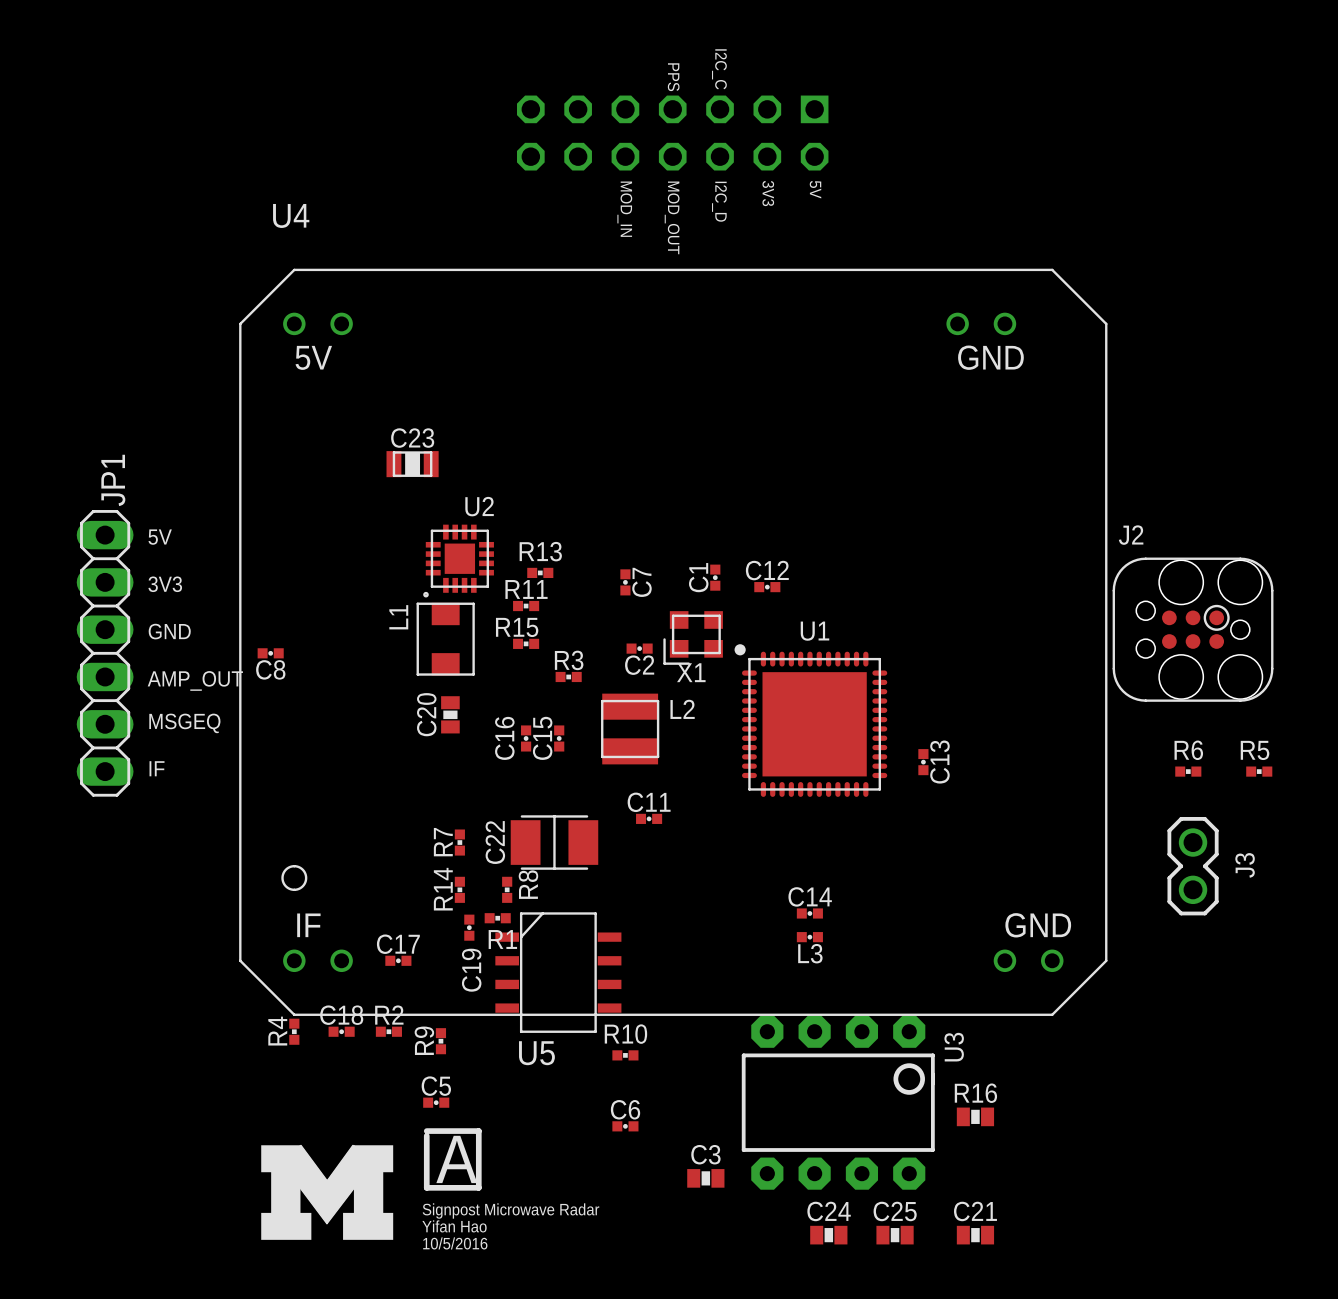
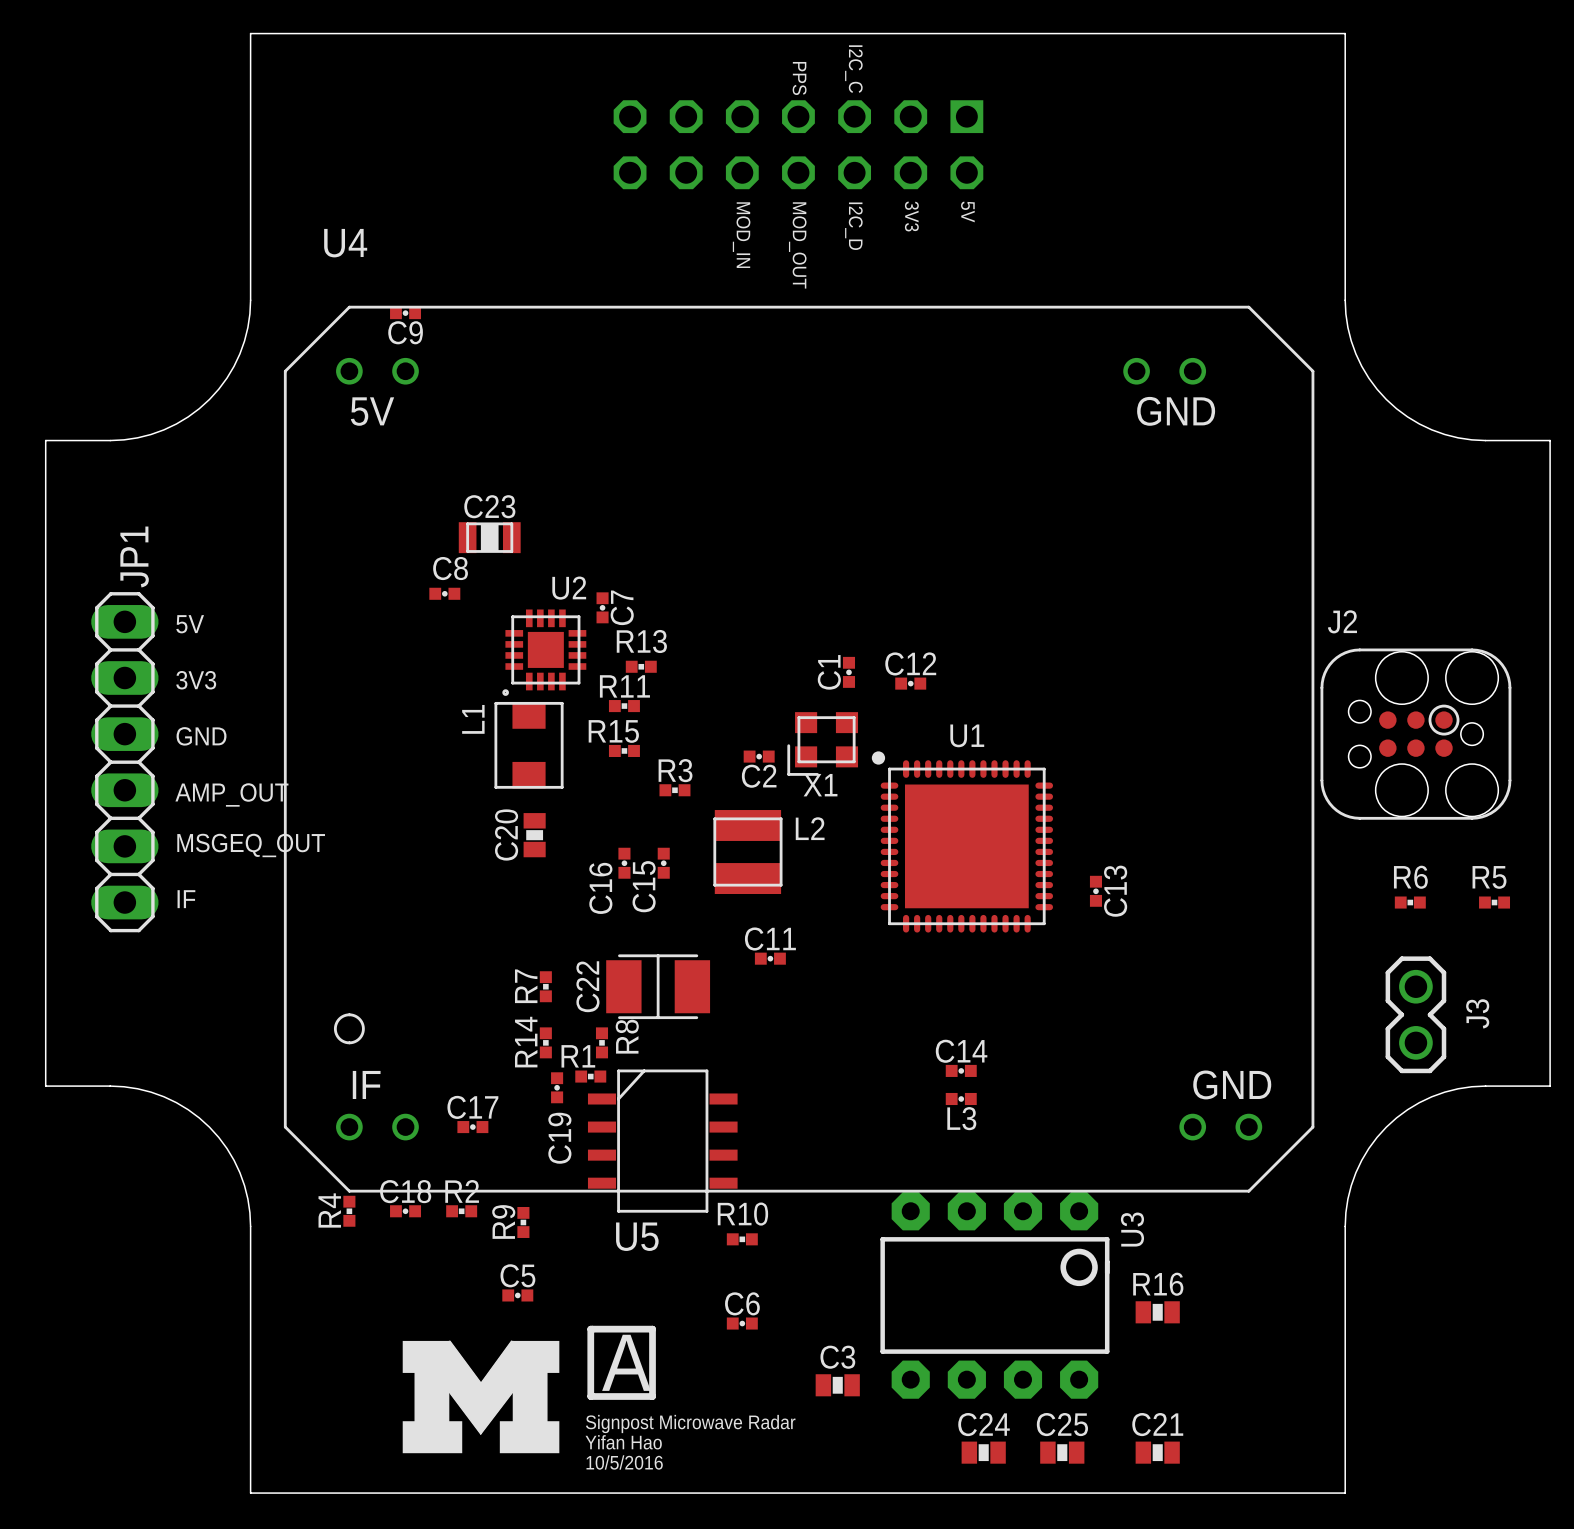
board edge: none -> (250, 33) (249, 313) (244, 340) (234, 366) (218, 389) (199, 408) (163, 429) (124, 439) (45, 440) (45, 1086) (124, 1086) (163, 1096) (199, 1117) (218, 1137) (234, 1160) (244, 1185) (249, 1212) (250, 1493) (1345, 1493) (1345, 1212) (1351, 1185) (1361, 1160) (1377, 1137) (1396, 1117) (1431, 1096) (1471, 1086) (1550, 1086) (1550, 440) (1471, 439) (1431, 429) (1396, 408) (1377, 389) (1361, 366) (1351, 340) (1345, 313) (1345, 33) (250, 33)
C9: none -> (405, 313)
C7 position: (625, 582) -> (602, 607)
C8 position: (270, 653) -> (444, 593)
C8 name position: C8 (270, 669) -> C8 (450, 568)
text: MSGEQ (184, 723) -> MSGEQ_OUT (251, 845)
C16 name position: C16 (504, 738) -> C16 (600, 888)
C15 name position: C15 (542, 738) -> C15 (644, 886)
R1 name position: R1 (502, 939) -> R1 (578, 1056)
line: (426, 1131) (478, 1131) (478, 1187) (426, 1187) (426, 1135) -> none
line: none -> (590, 1329) (652, 1329) (652, 1396) (590, 1396) (590, 1329)
text position: A (456, 1159) -> A (626, 1362)
drawing position: (327, 1192) -> (481, 1397)
text position: Signpost Microwave Radar (510, 1211) -> Signpost Microwave Radar (690, 1424)
text position: Yifan Hao (454, 1226) -> Yifan Hao (623, 1442)
text position: 10/5/2016 (455, 1243) -> 10/5/2016 (624, 1462)

